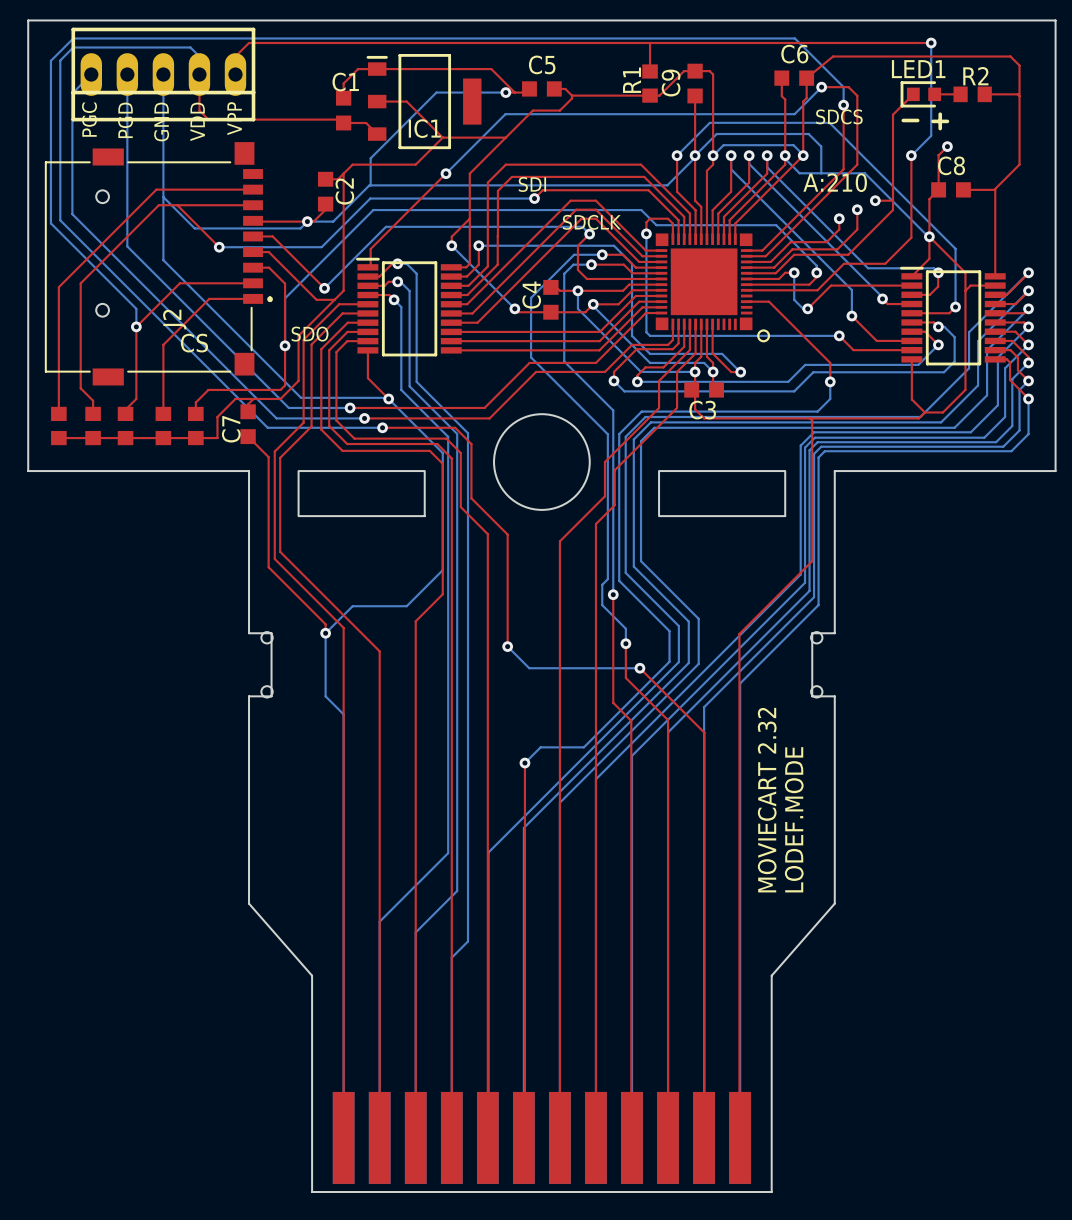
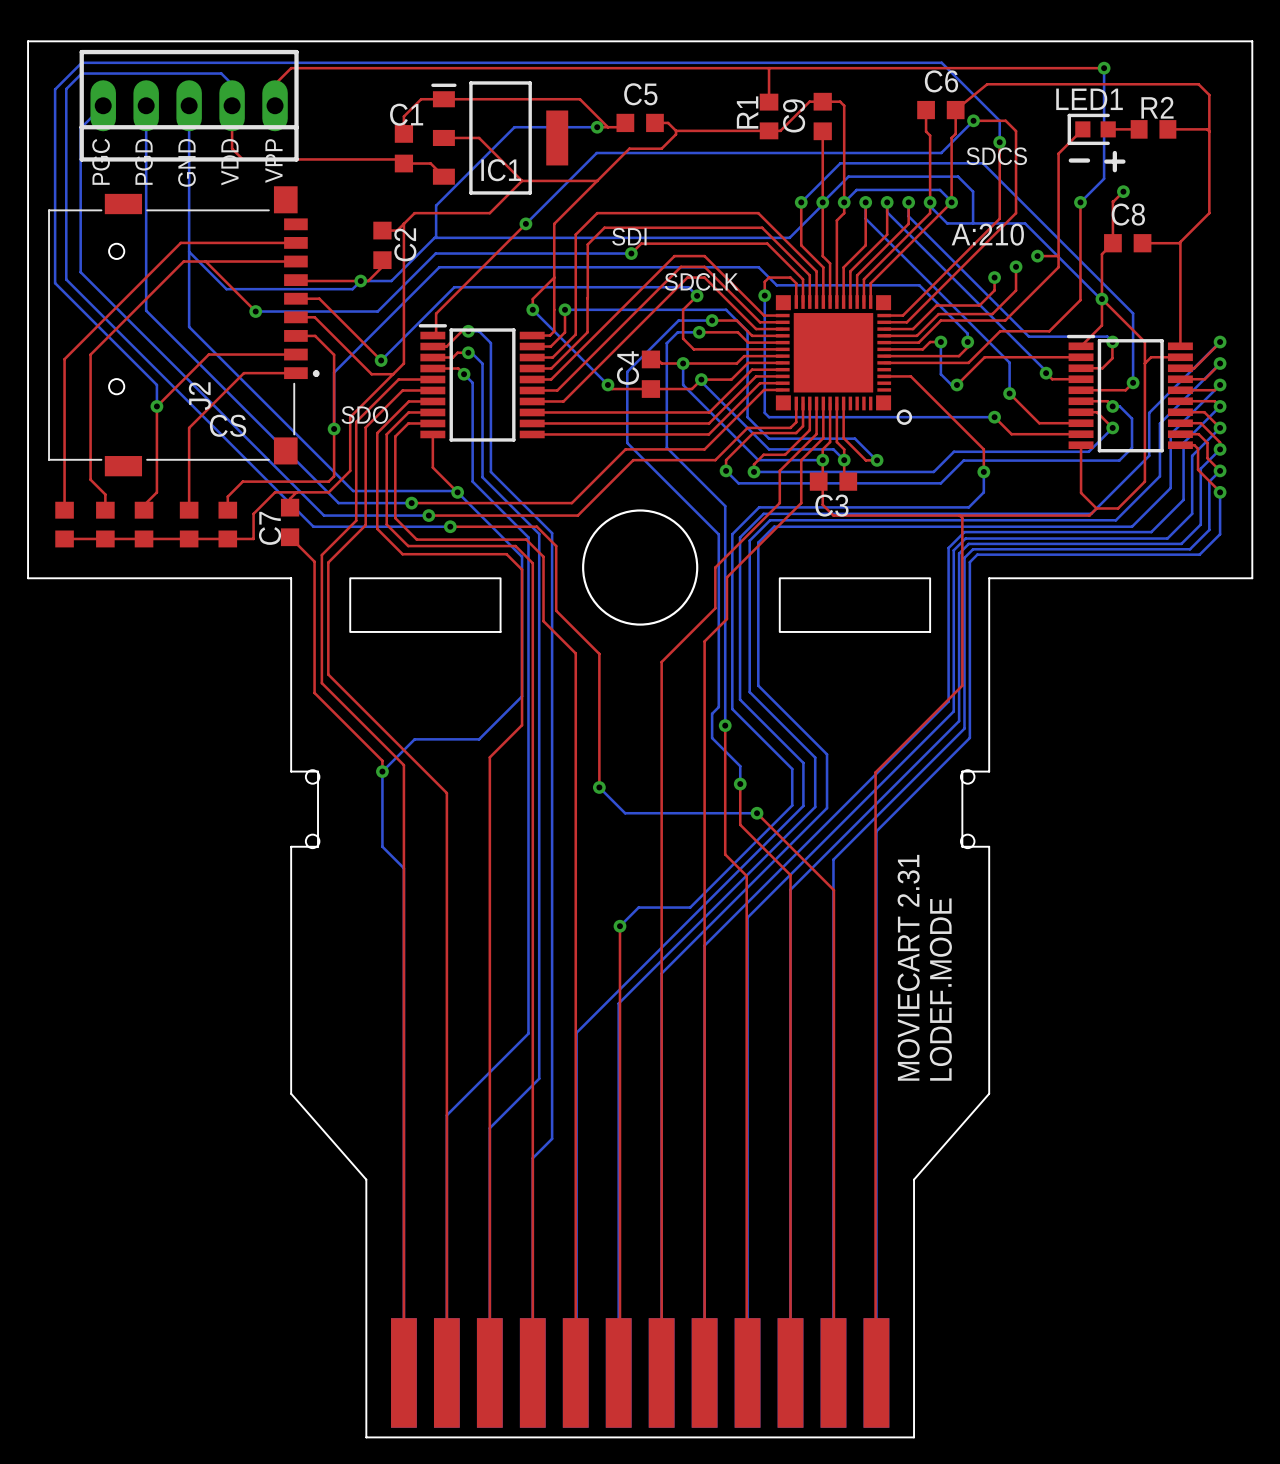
text: MOVIECART 2.32 (767, 800) -> MOVIECART 2.31 (908, 967)

